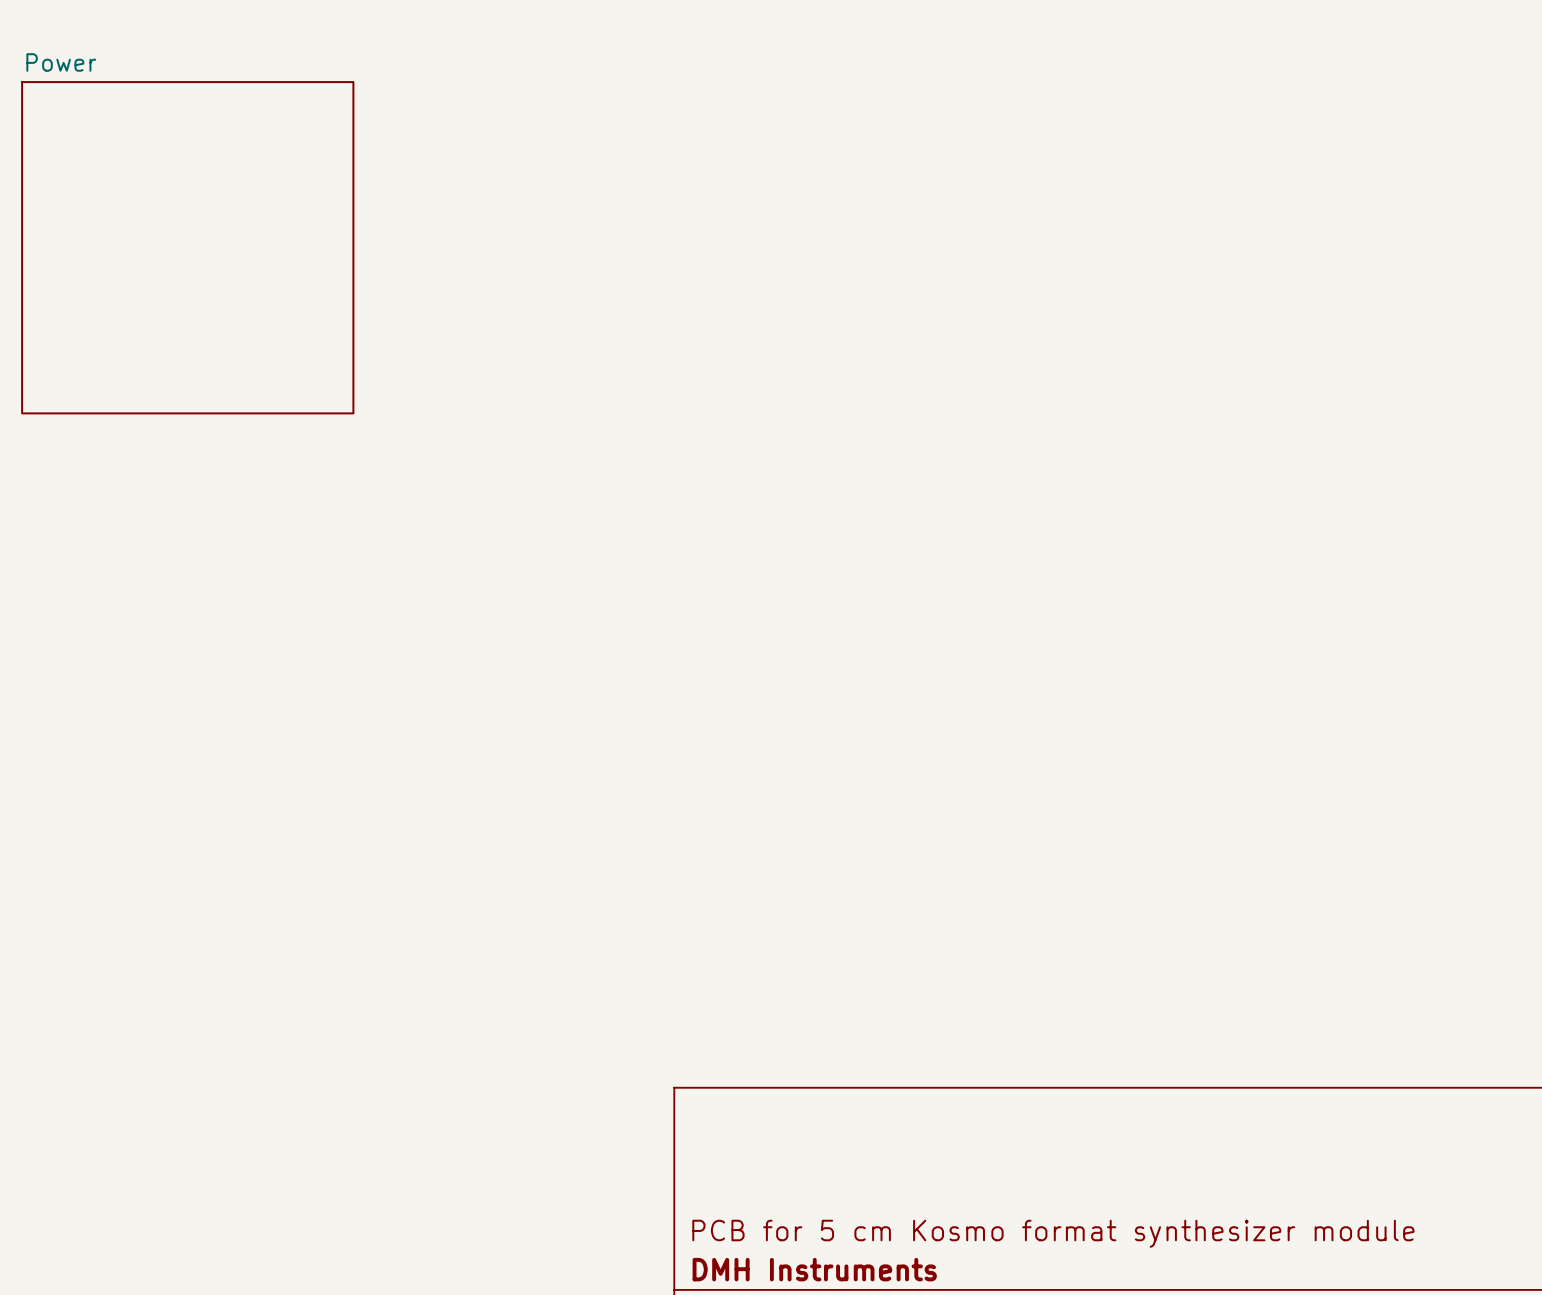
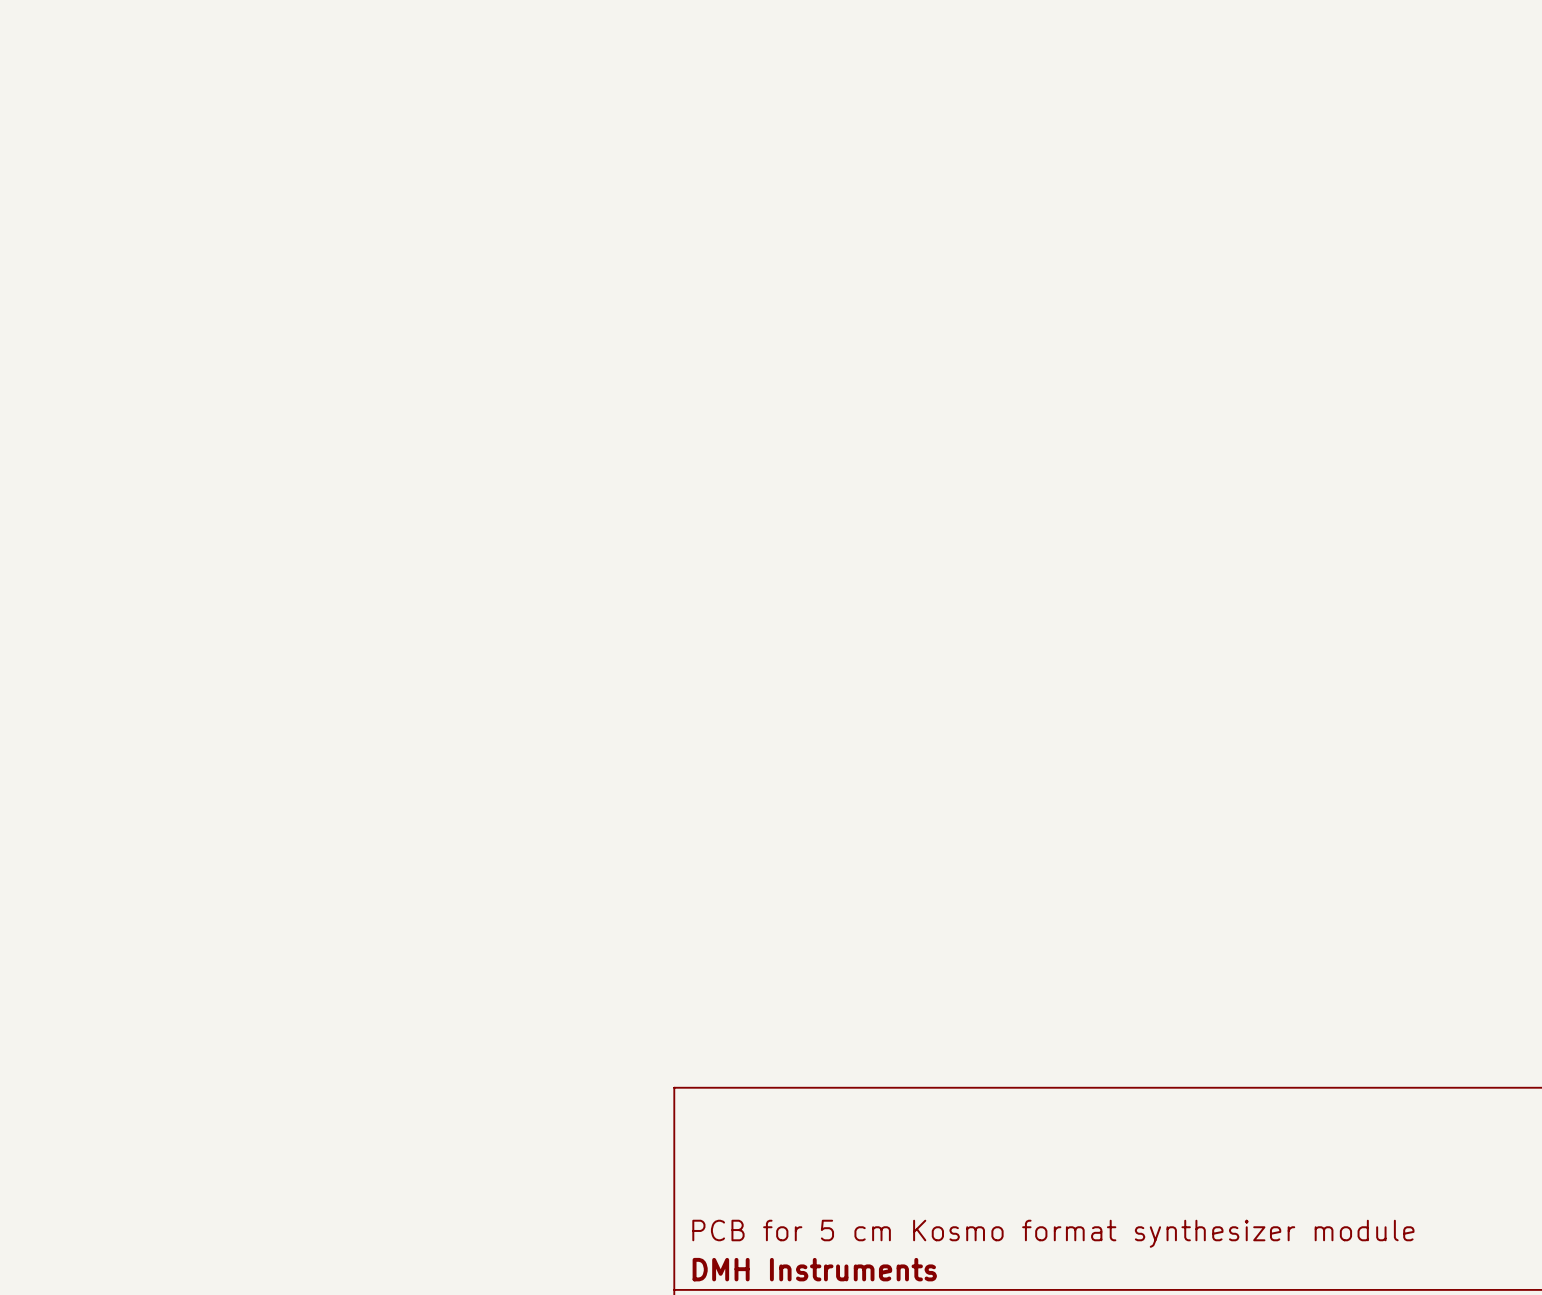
sheet Power: (187, 247) -> none

